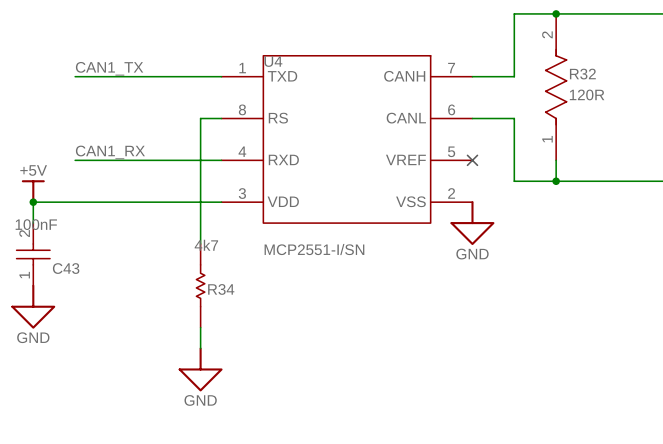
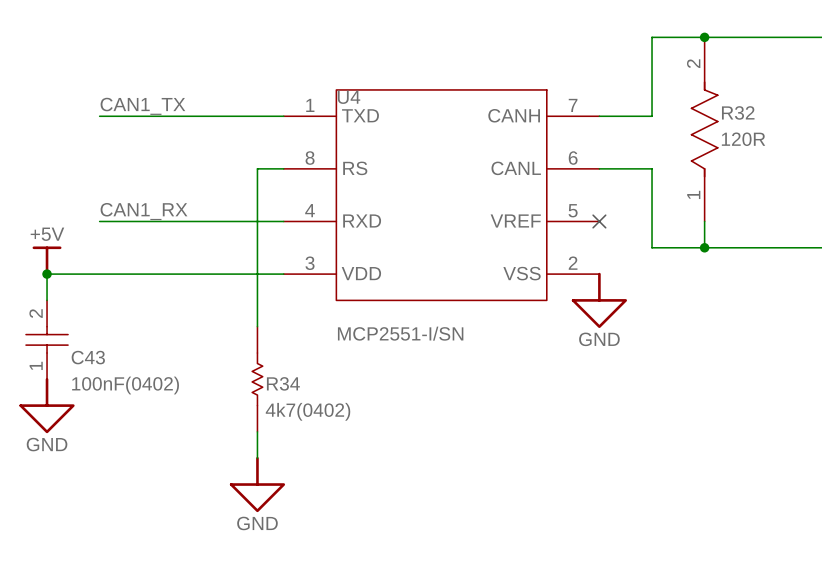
C43 value: 100nF (36, 224) -> none
R34 value: 4k7 (206, 245) -> none
C43 text: none -> 100nF(0402) (125, 385)
R34 text: none -> 4k7(0402) (308, 411)

